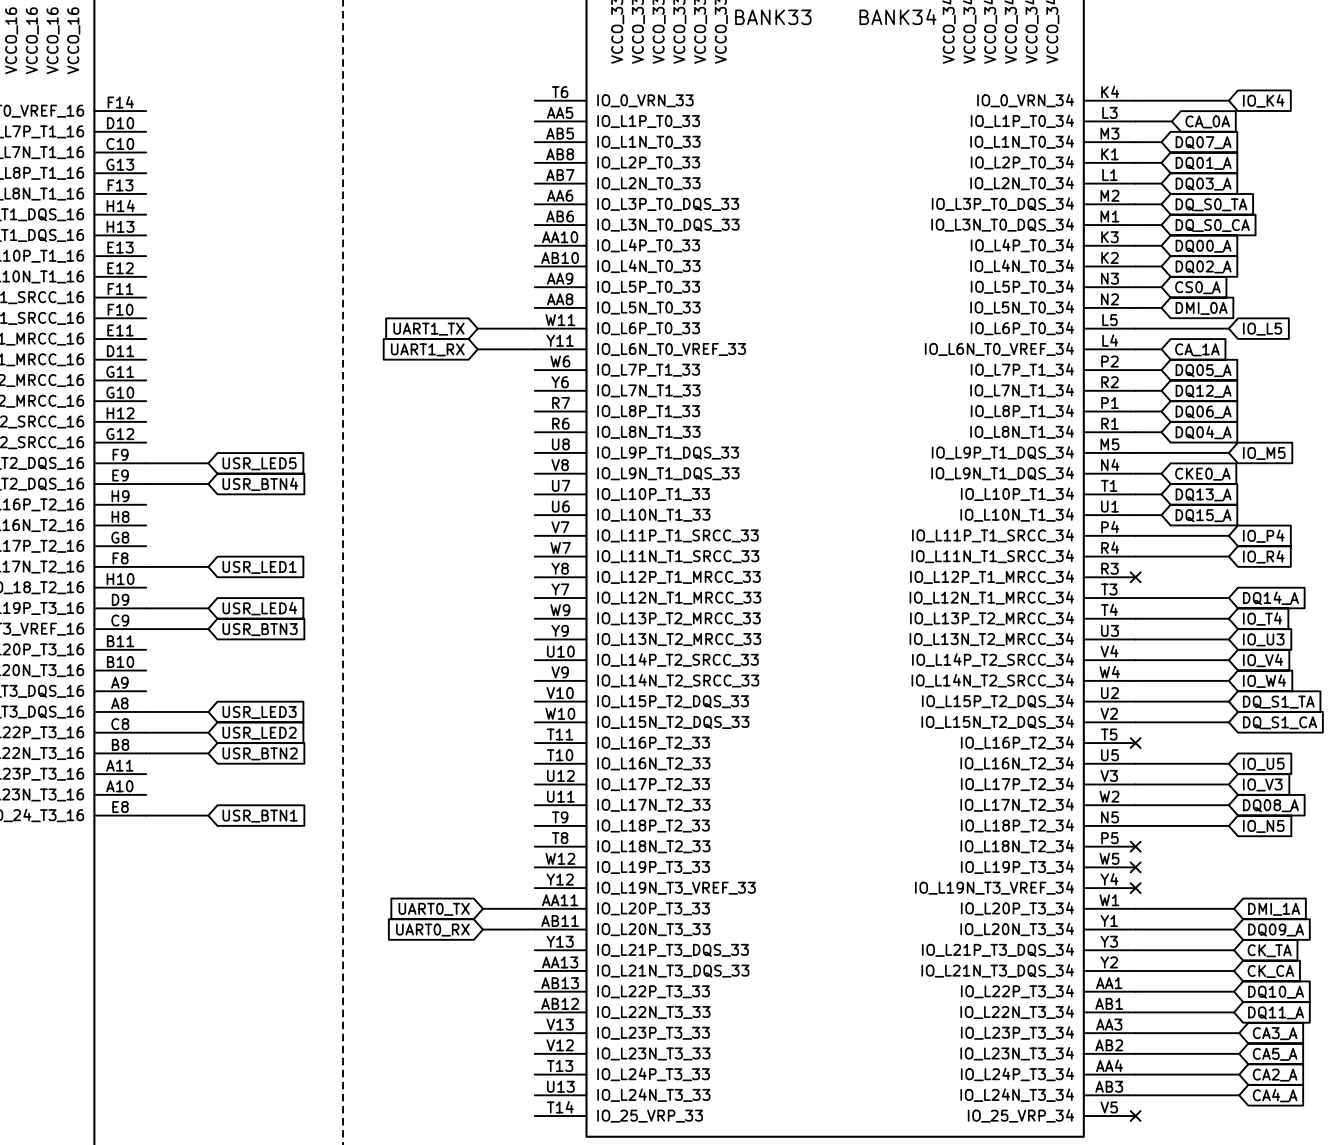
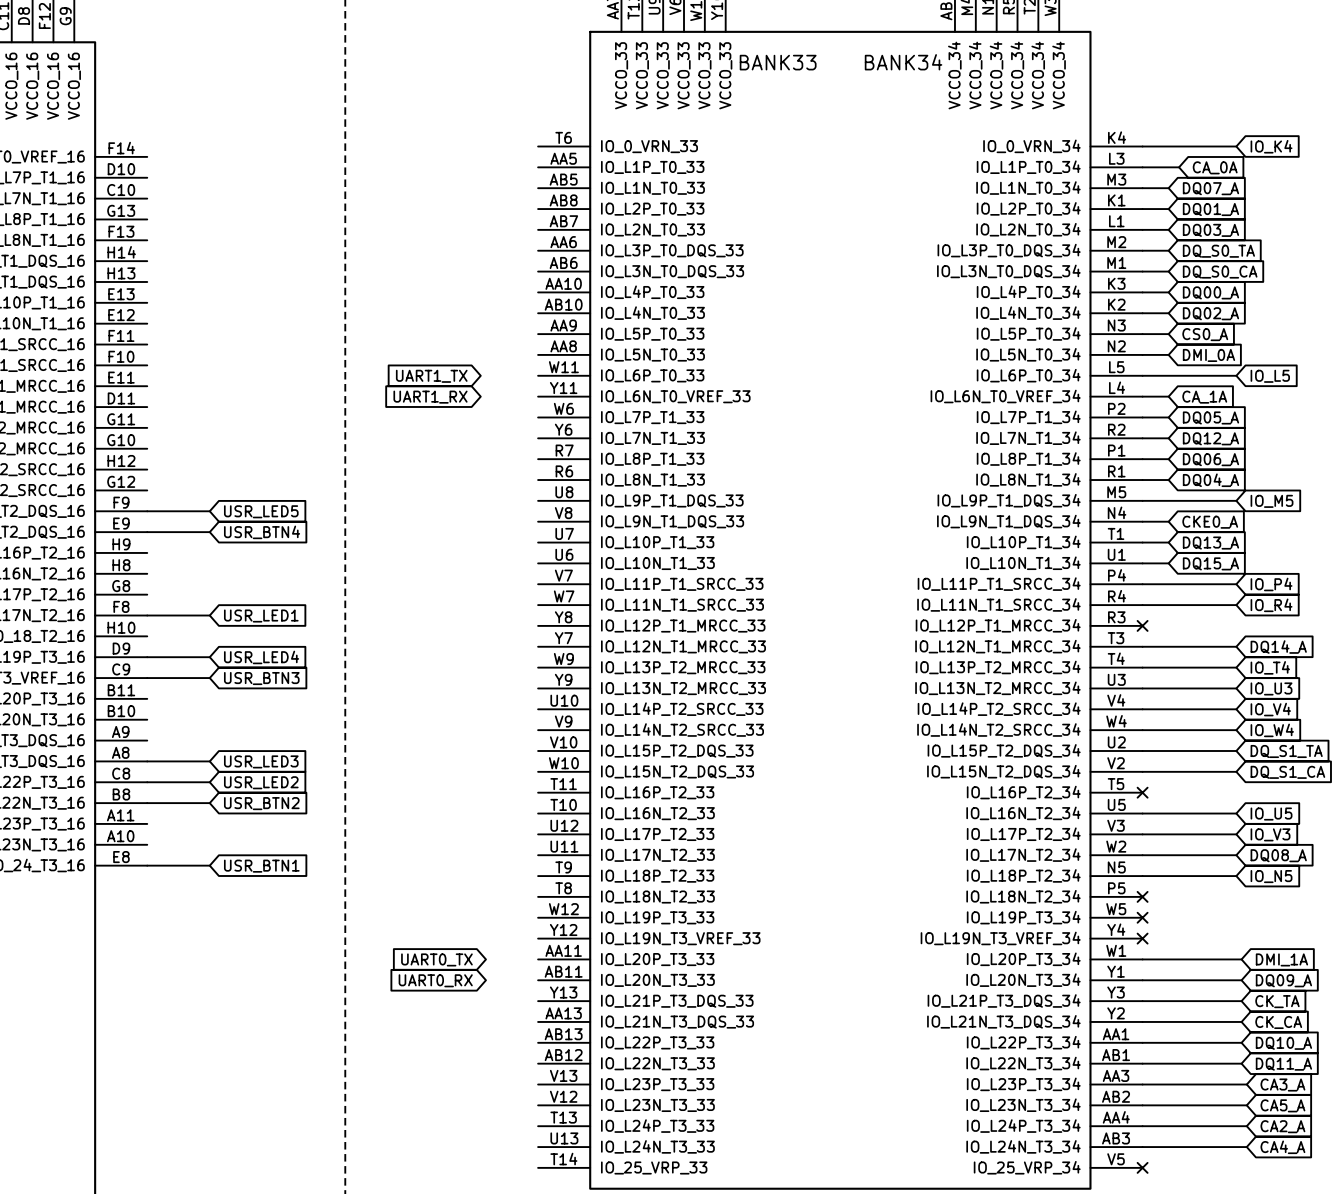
wire: (477, 328) (534, 328) -> none
wire: (477, 349) (534, 349) -> none
wire: (482, 908) (534, 908) -> none
wire: (482, 929) (534, 929) -> none

